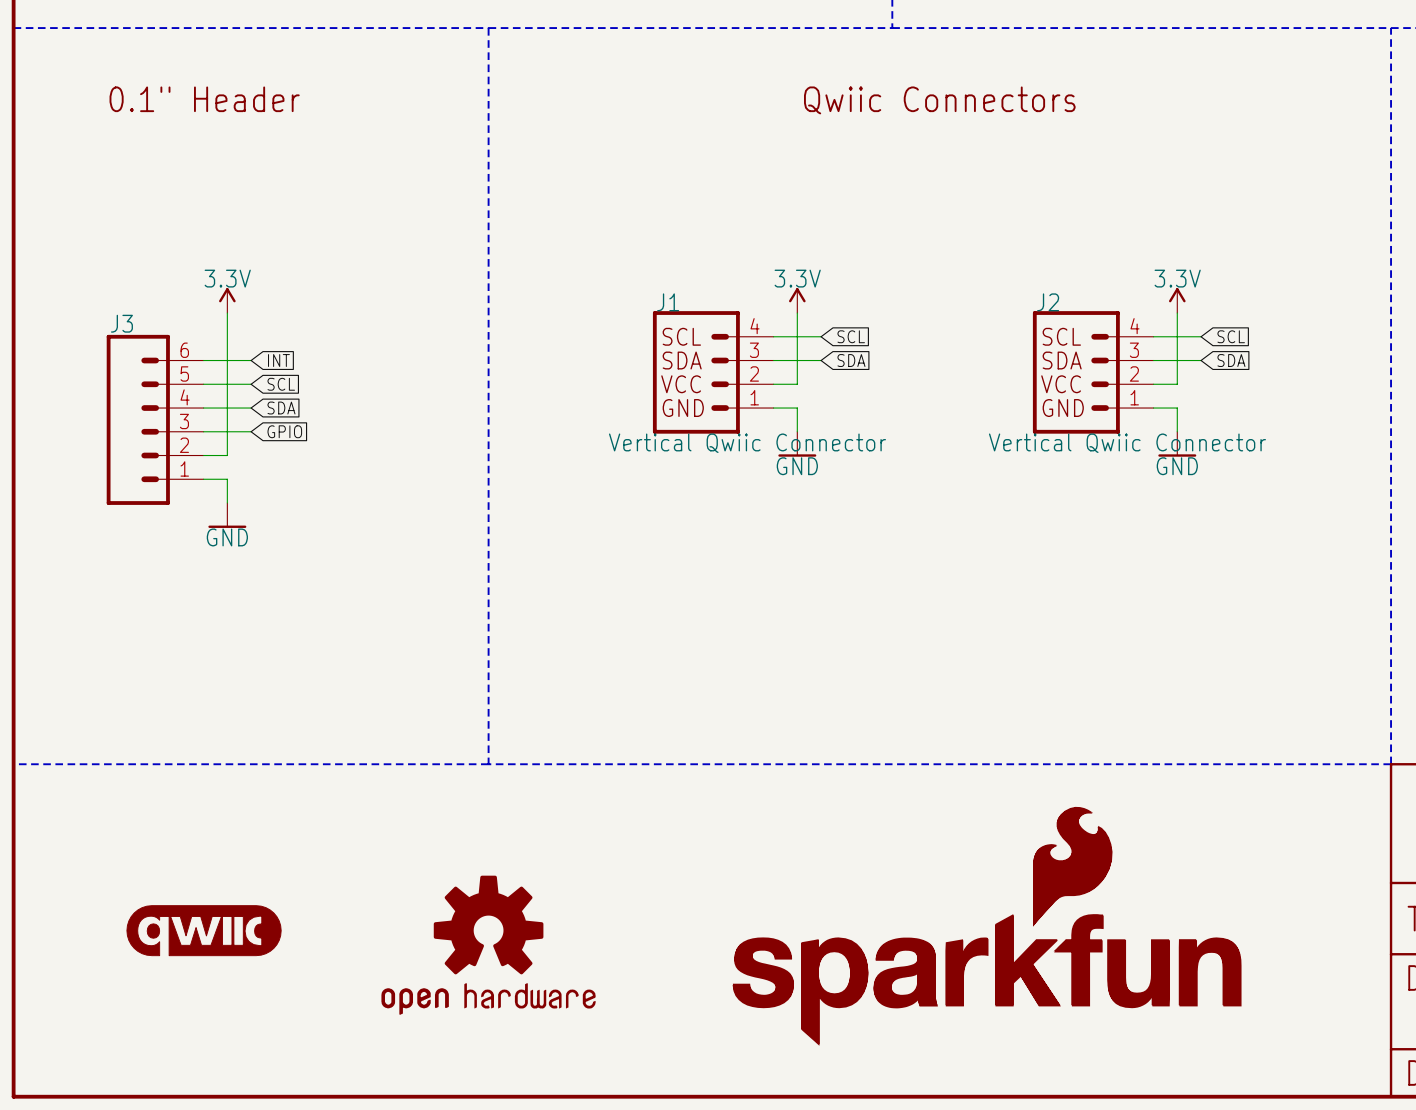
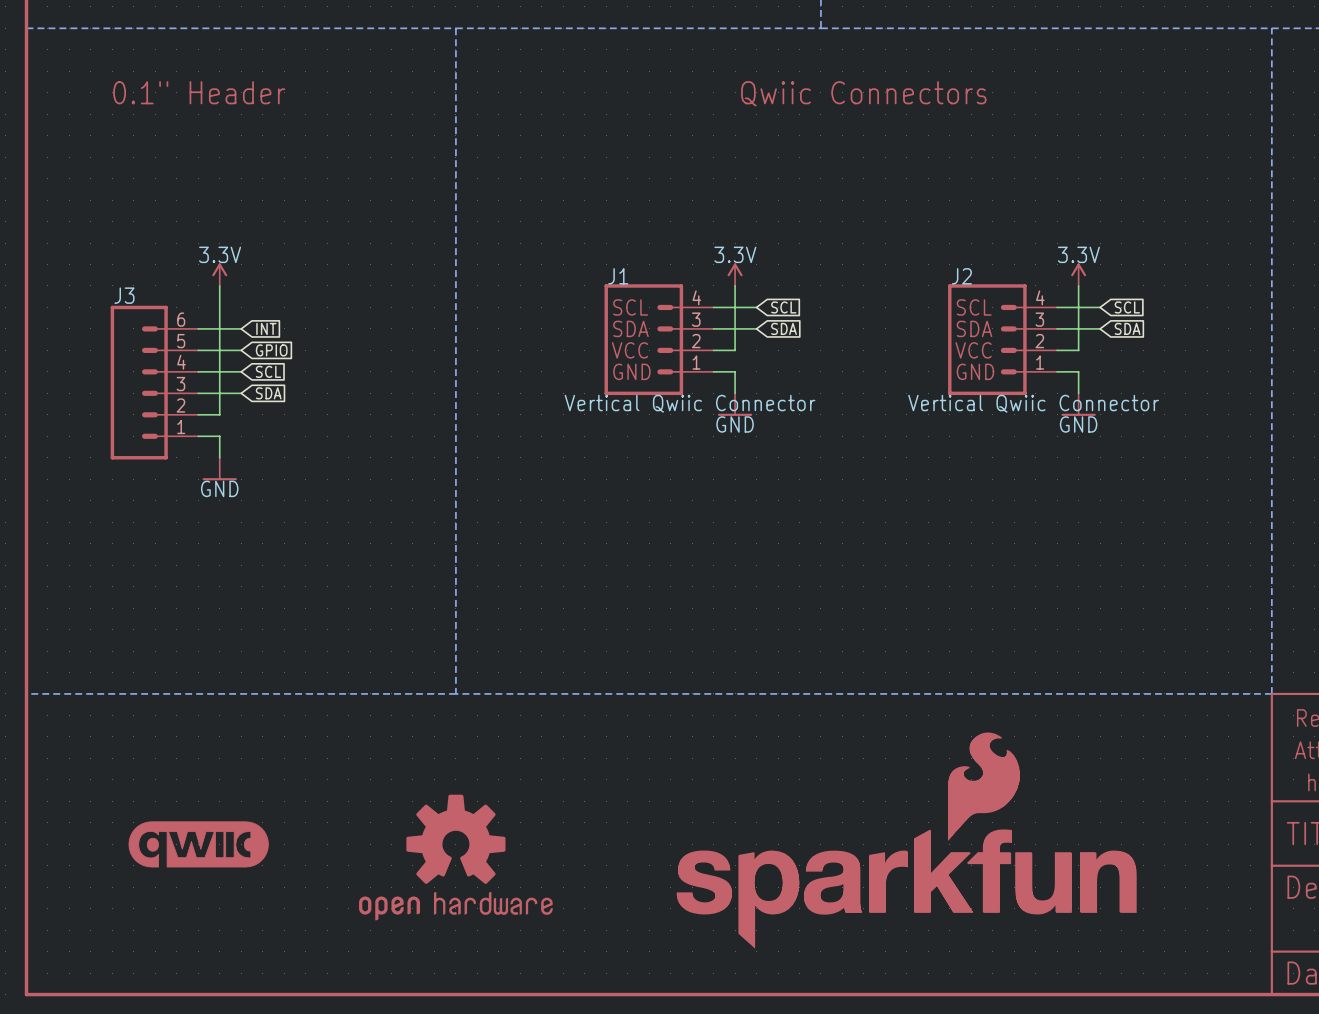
global label: SCL (281, 384) -> GPIO (271, 350)
global label: SDA (281, 408) -> SCL (268, 371)
global label: GPIO (284, 431) -> SDA (268, 393)

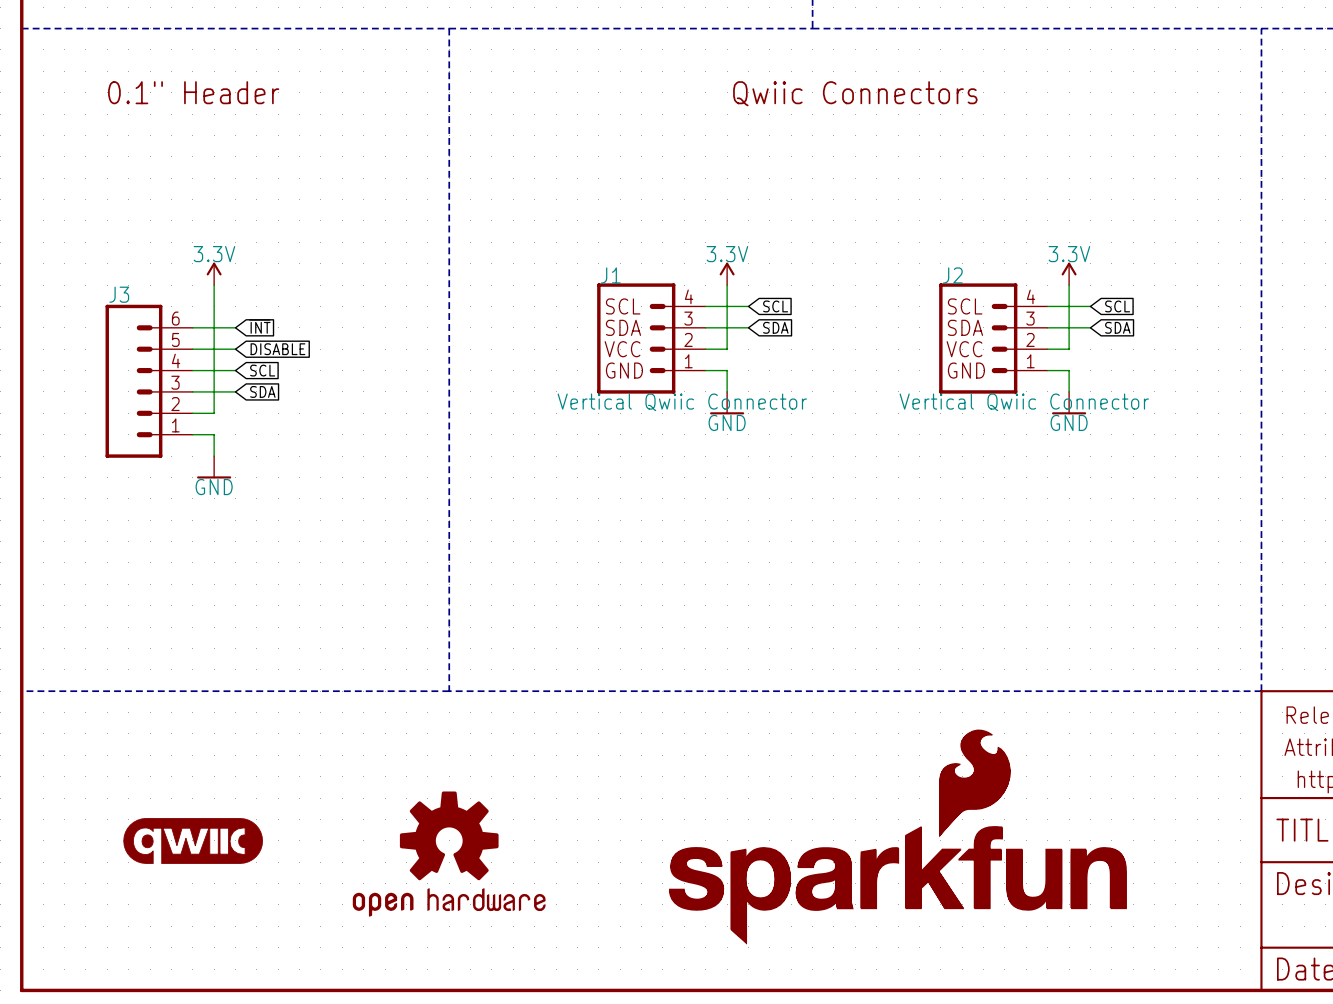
global label: INT (266, 328) -> ~{INT} (259, 326)
global label: GPIO (271, 350) -> DISABLE (277, 349)

